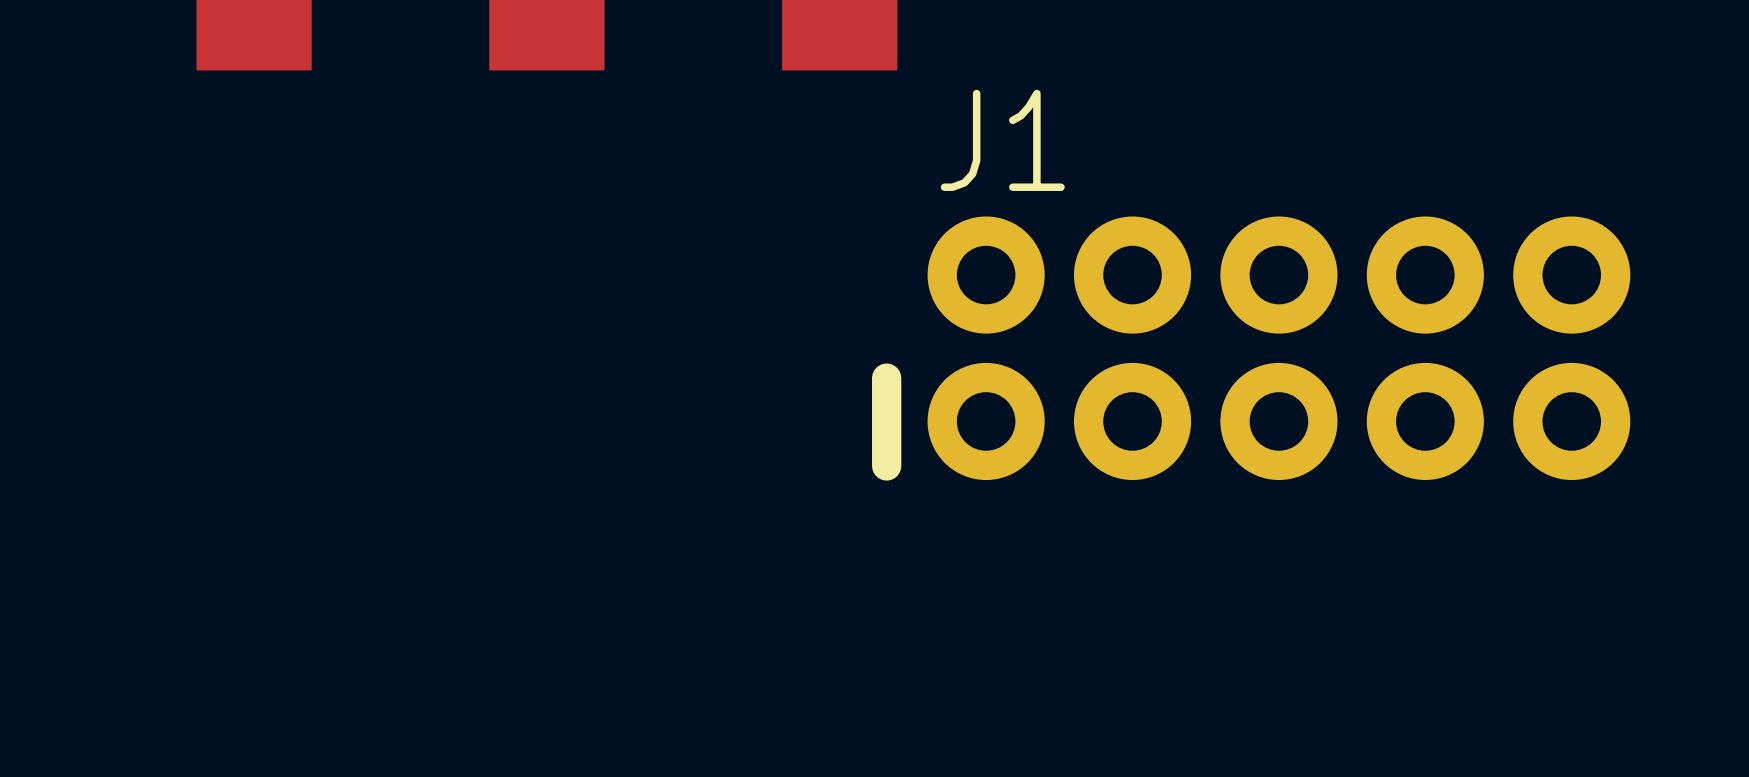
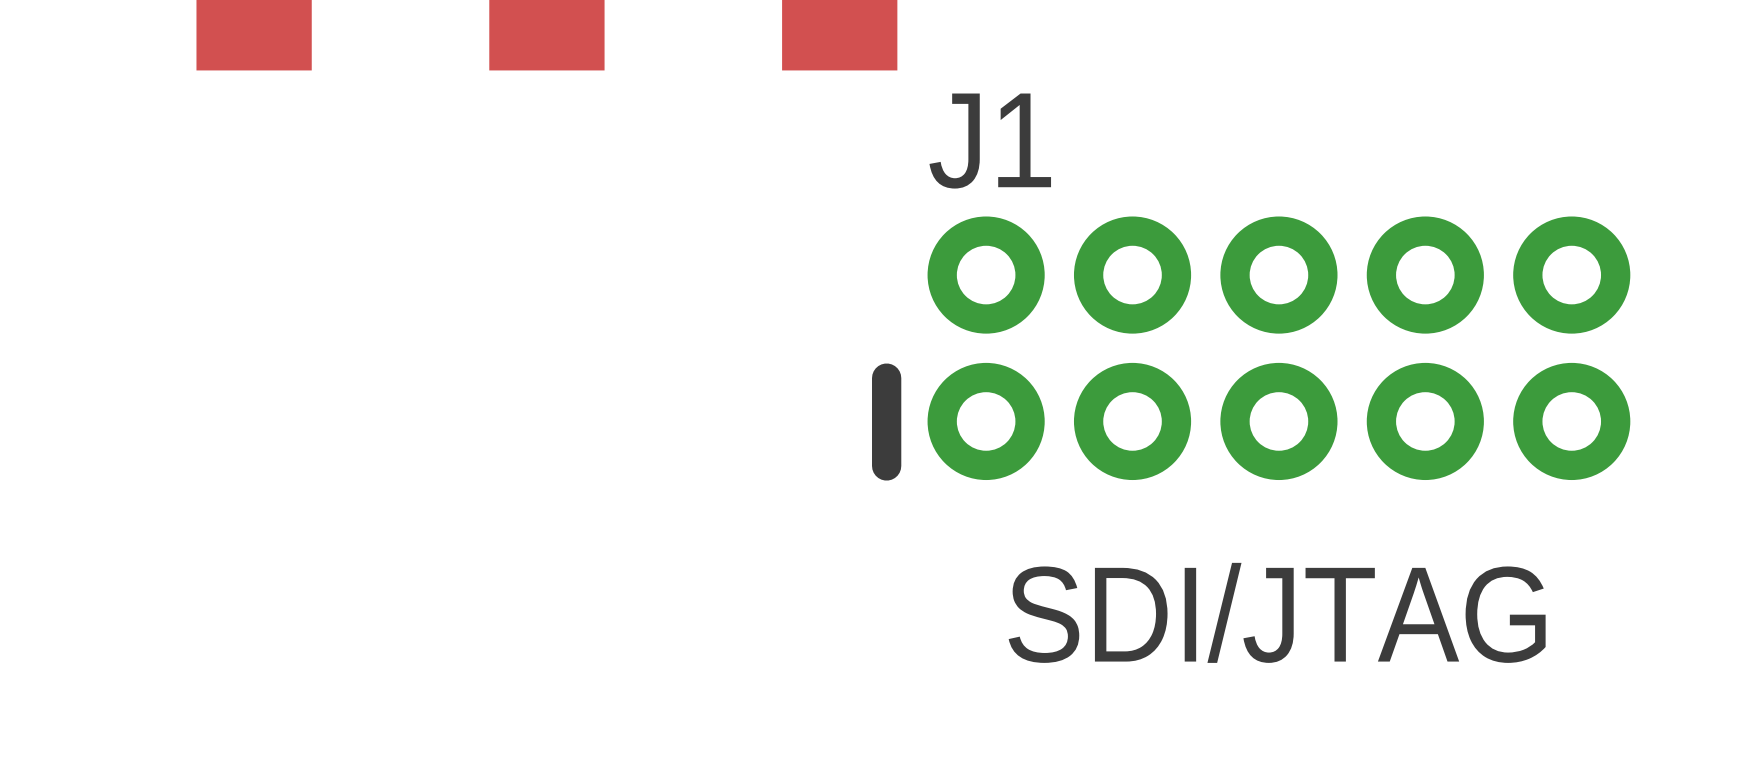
text: none -> SDI/JTAG (1277, 612)

